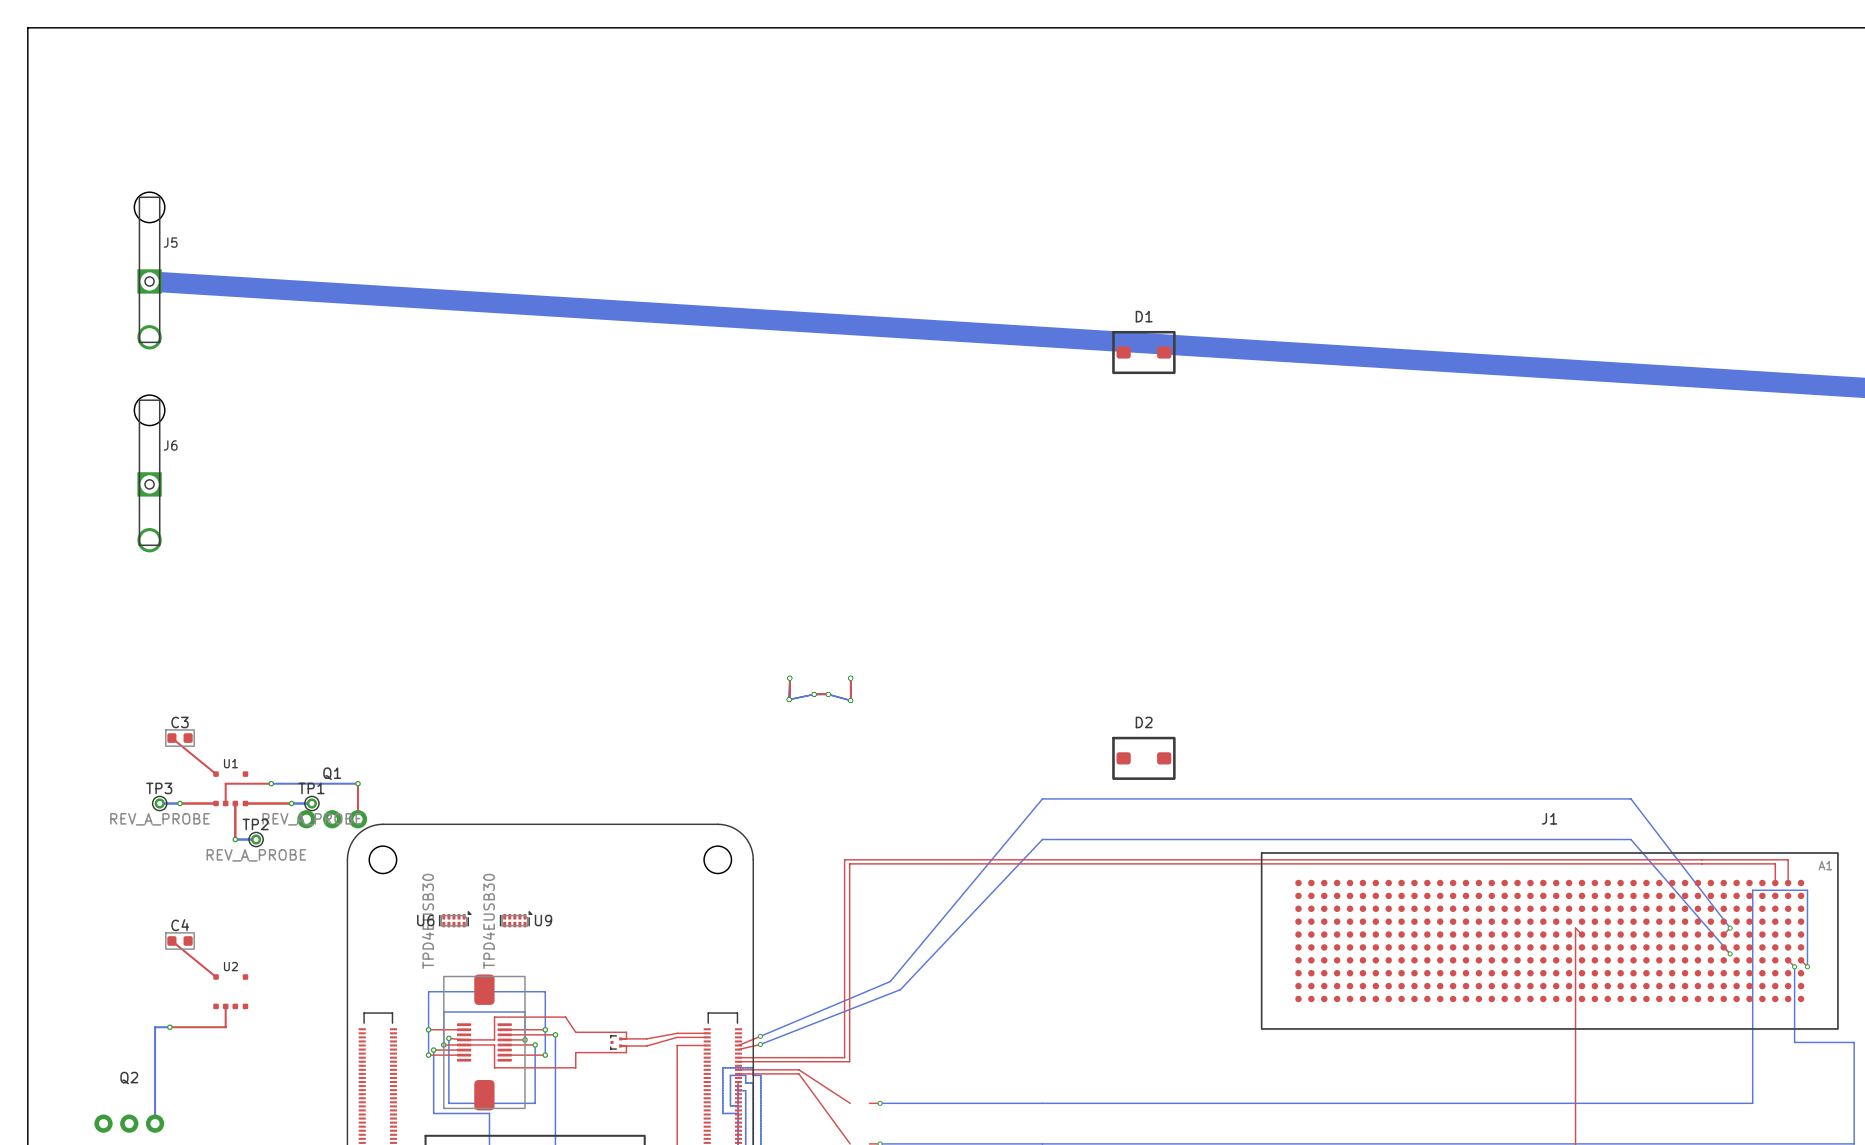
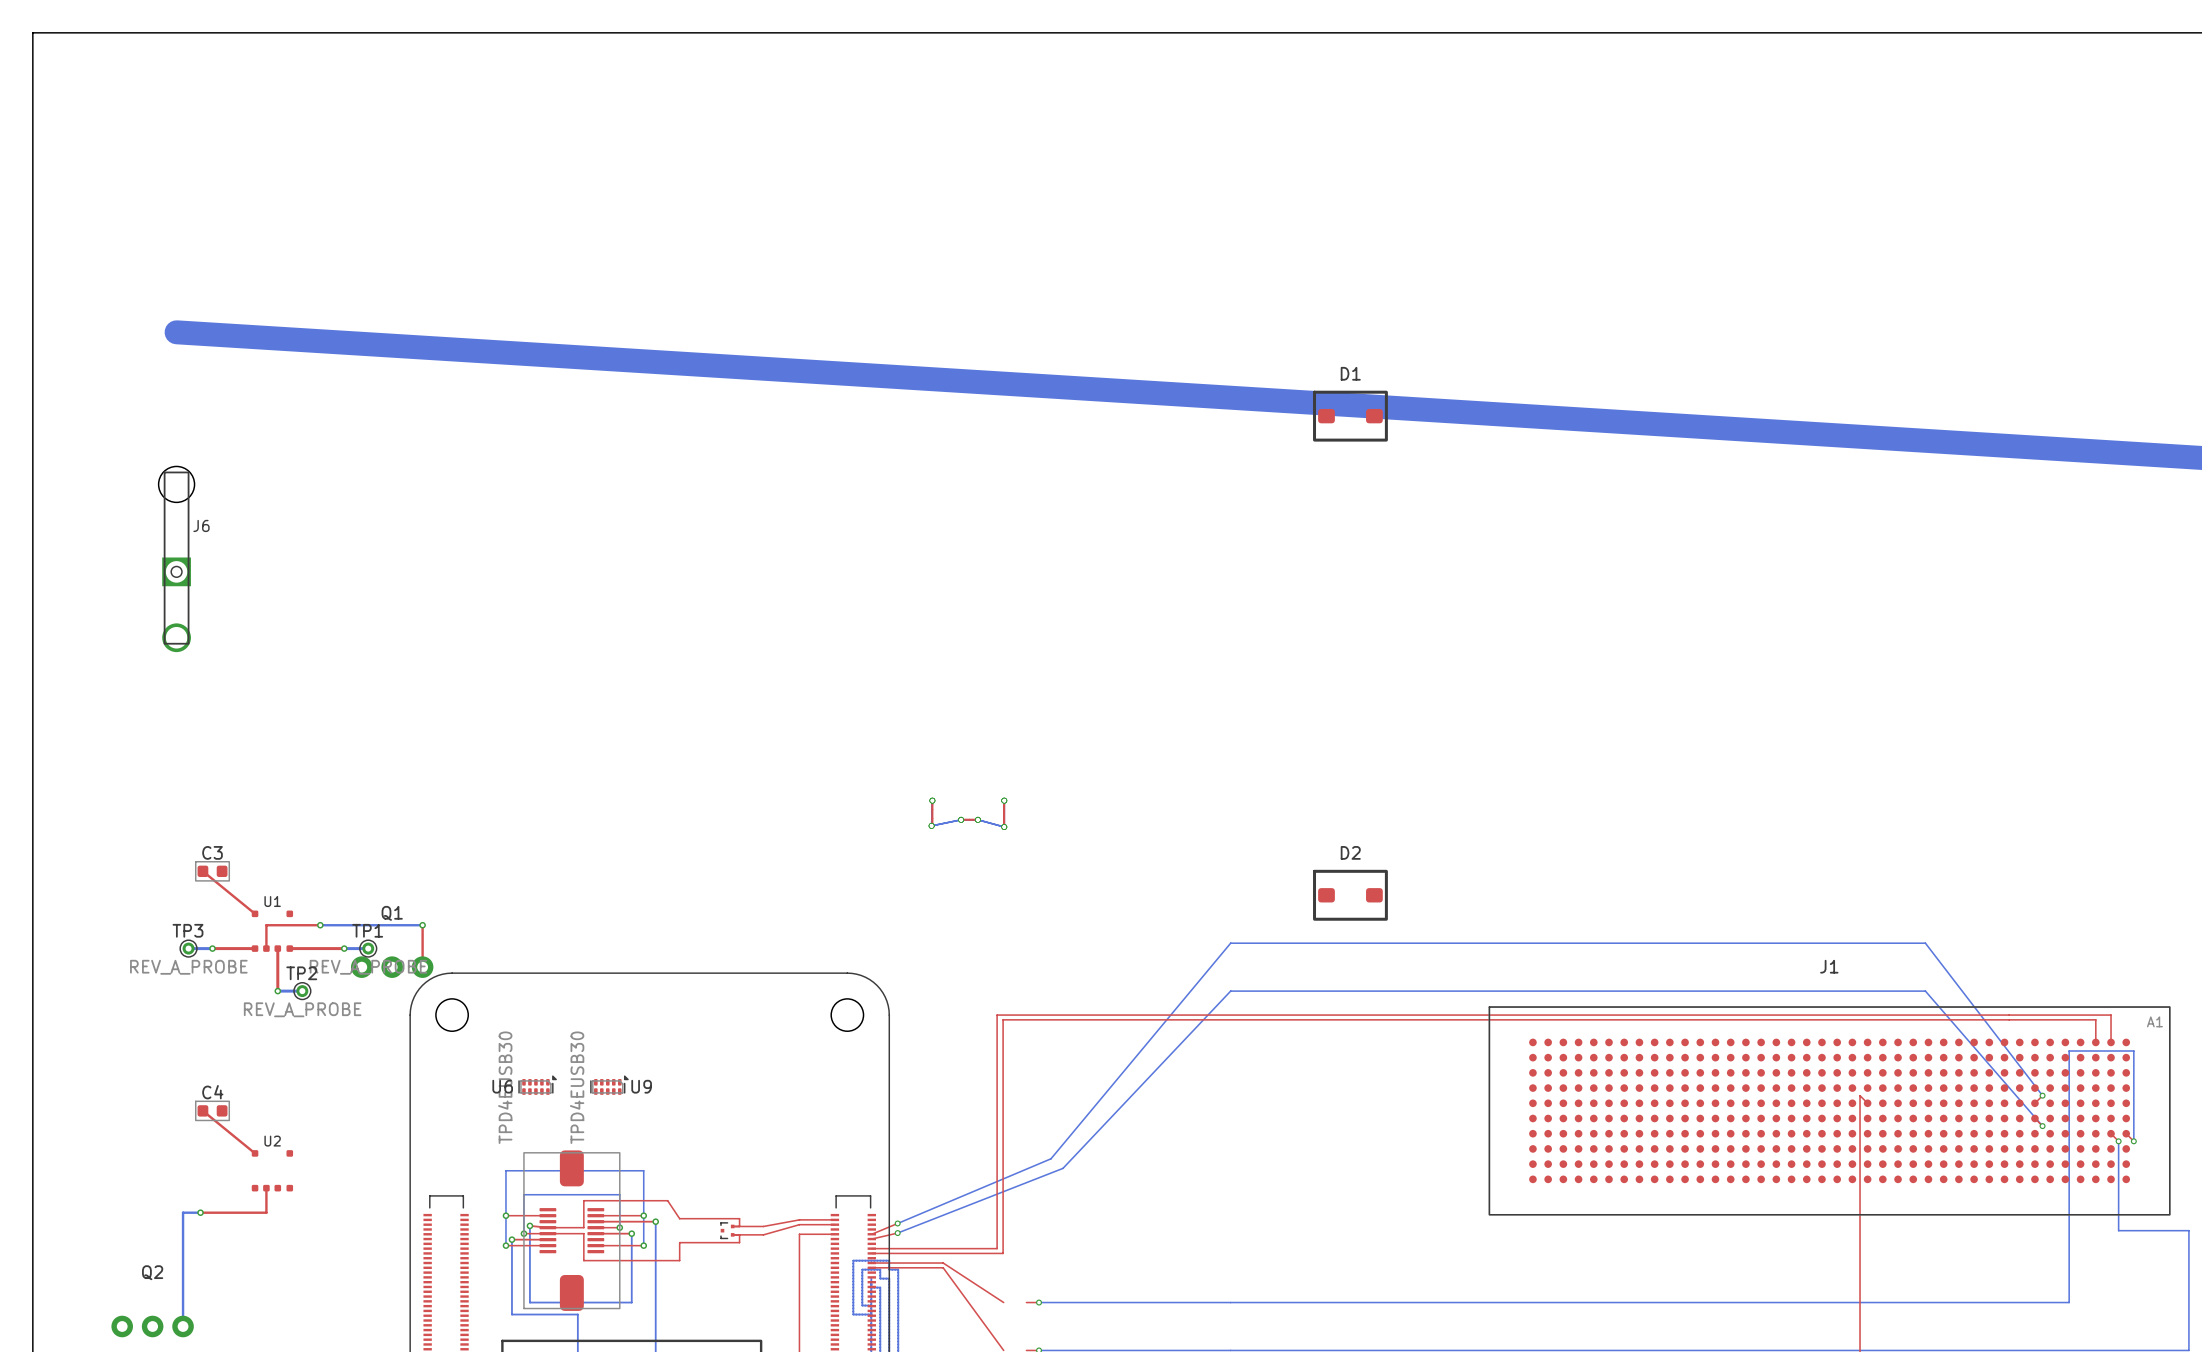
J5: (149, 270) -> none

